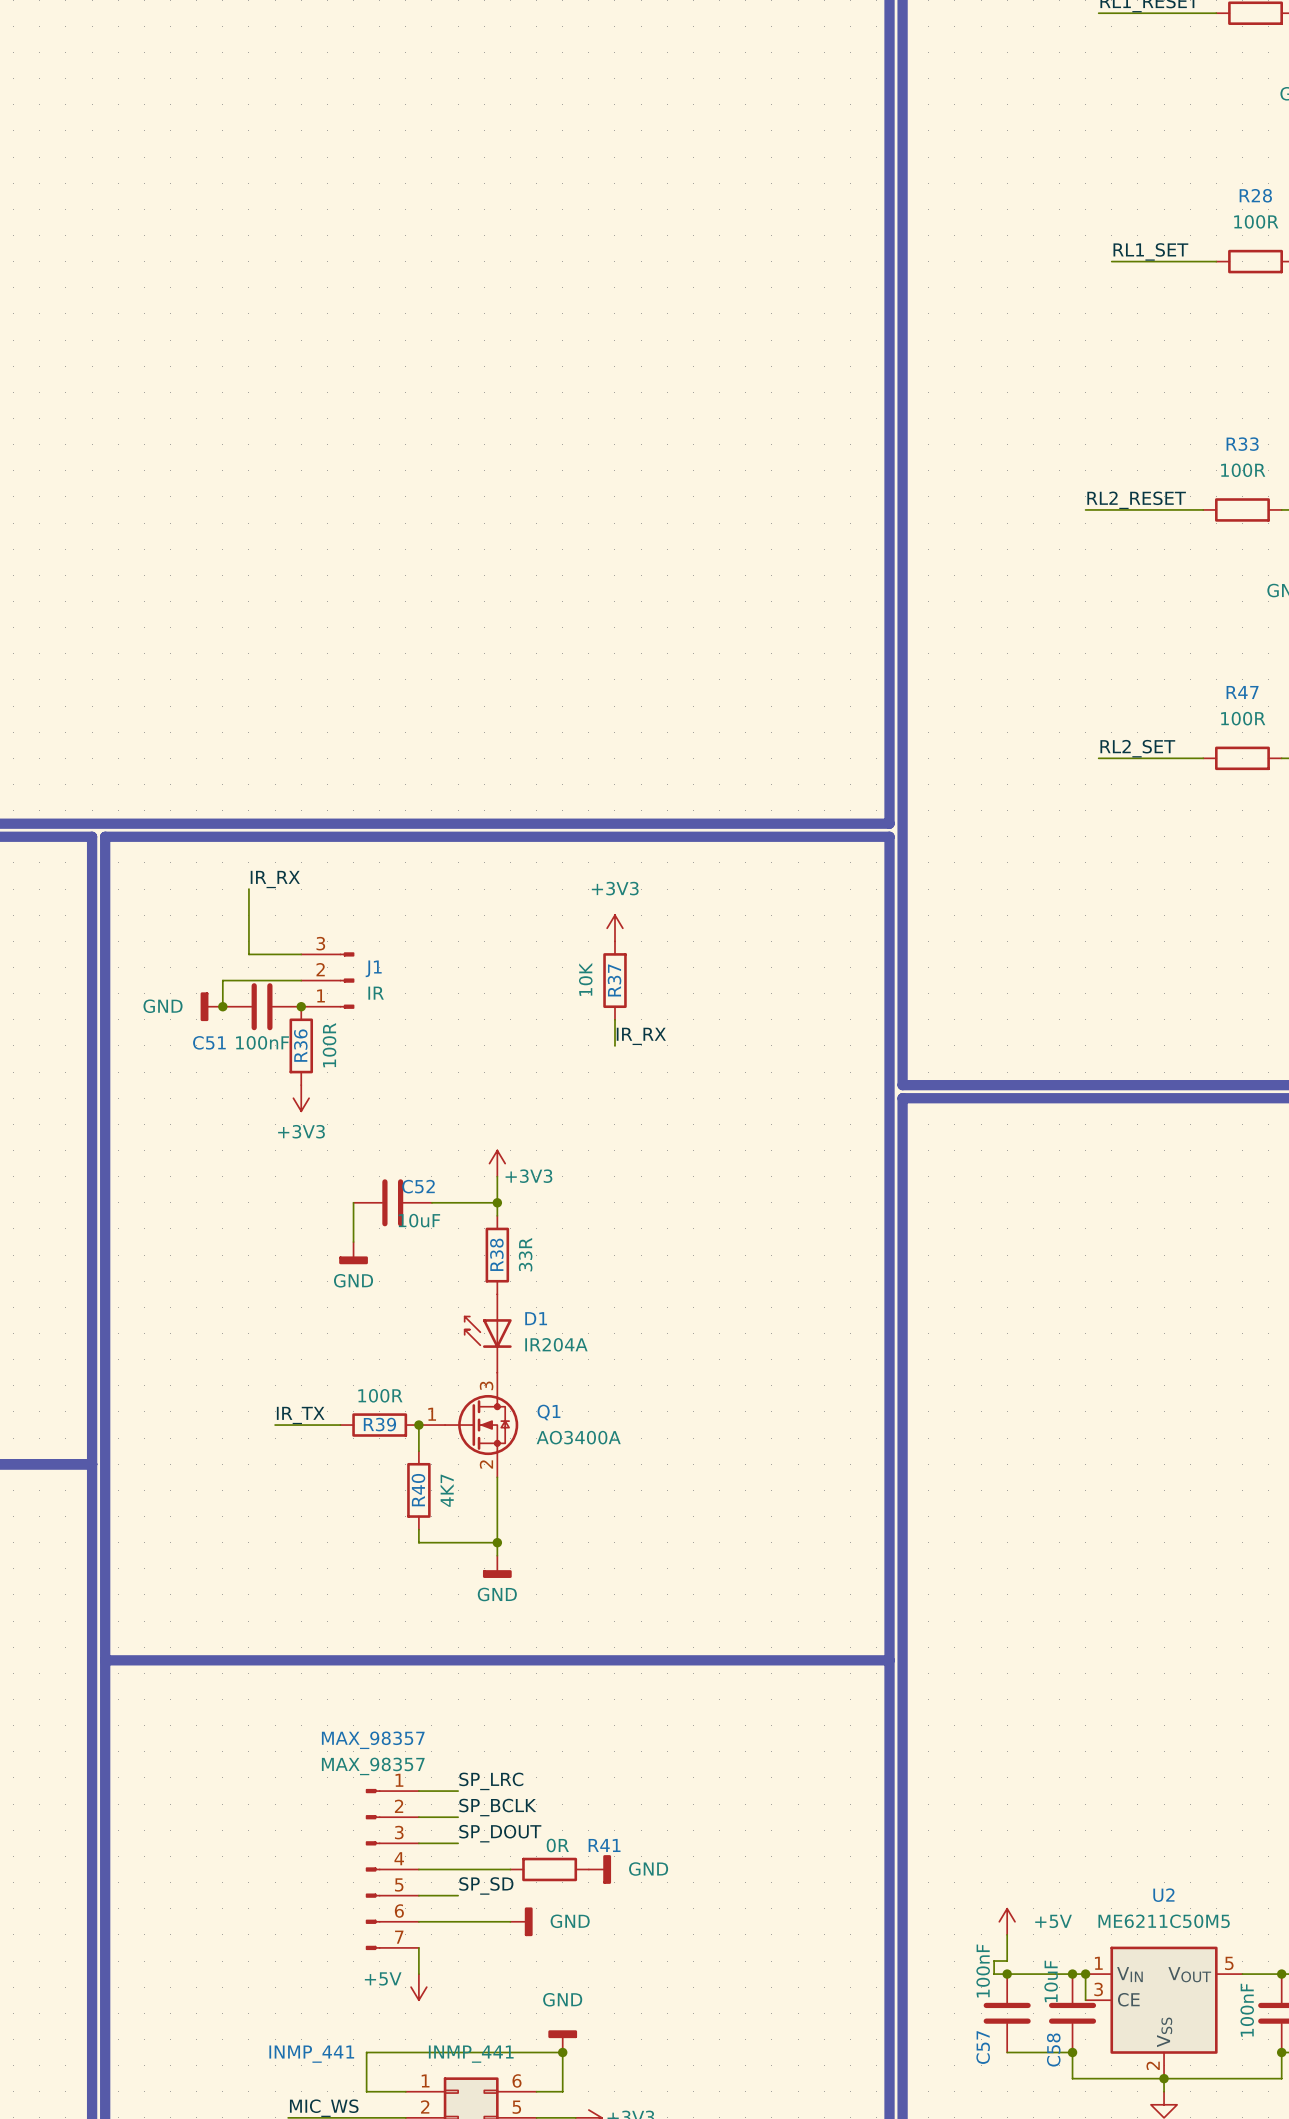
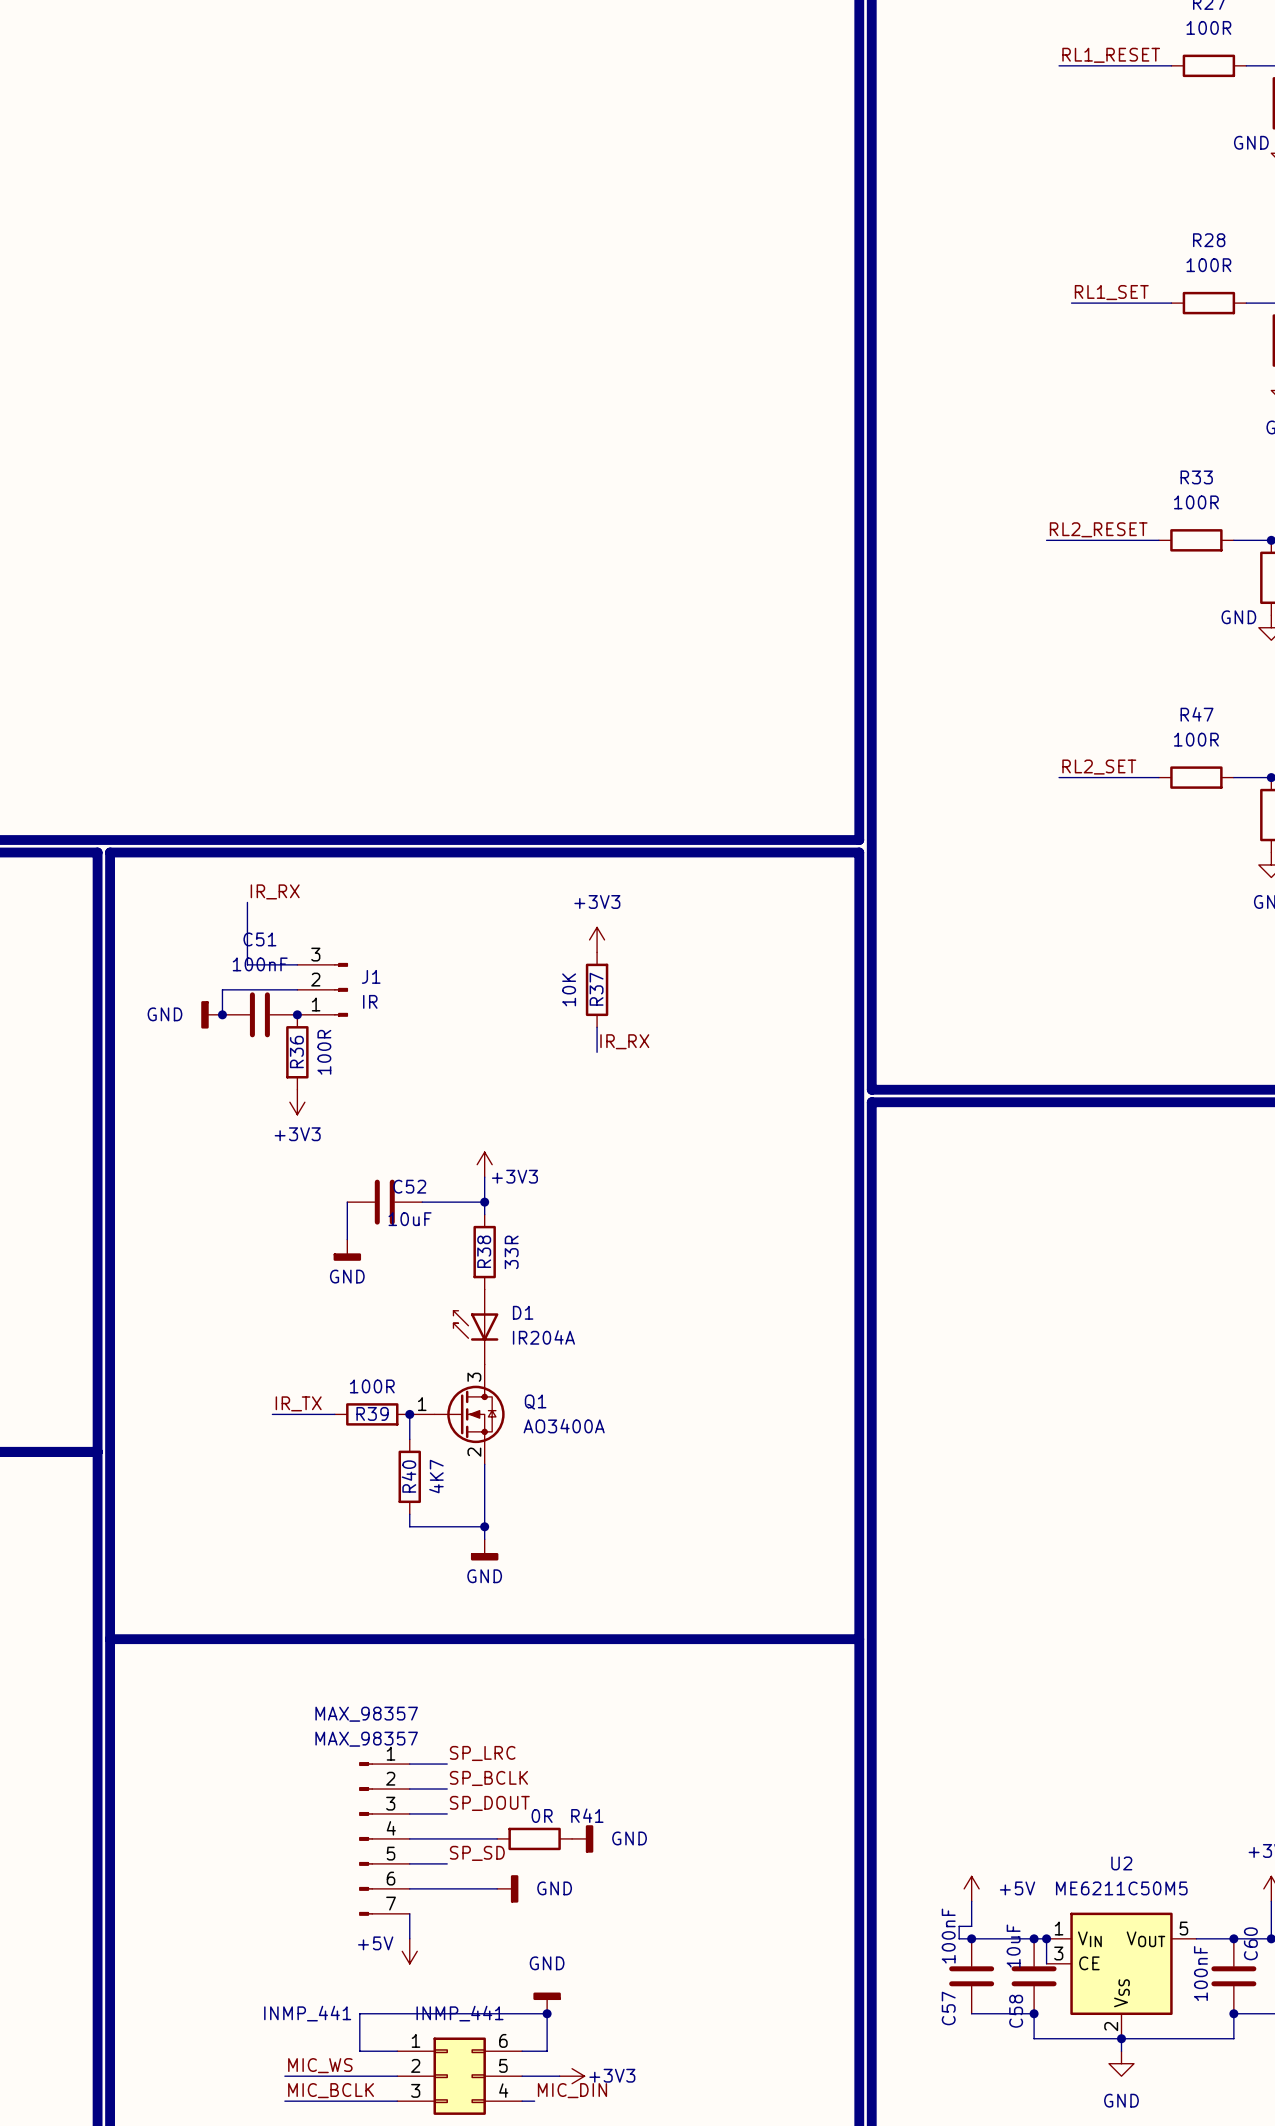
C51 name position: C51 (209, 1042) -> C51 (259, 939)
C51 value position: 100nF (262, 1042) -> 100nF (260, 964)

